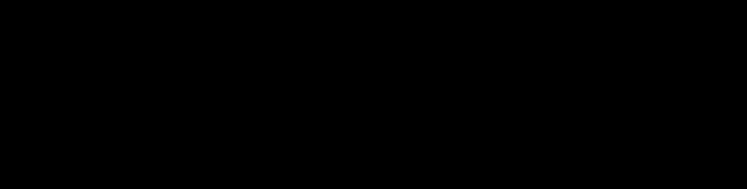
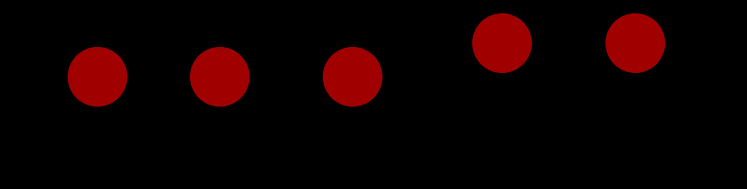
part: none -> (502, 43)
part: none -> (635, 43)
part: none -> (97, 76)
part: none -> (219, 76)
part: none -> (352, 76)

